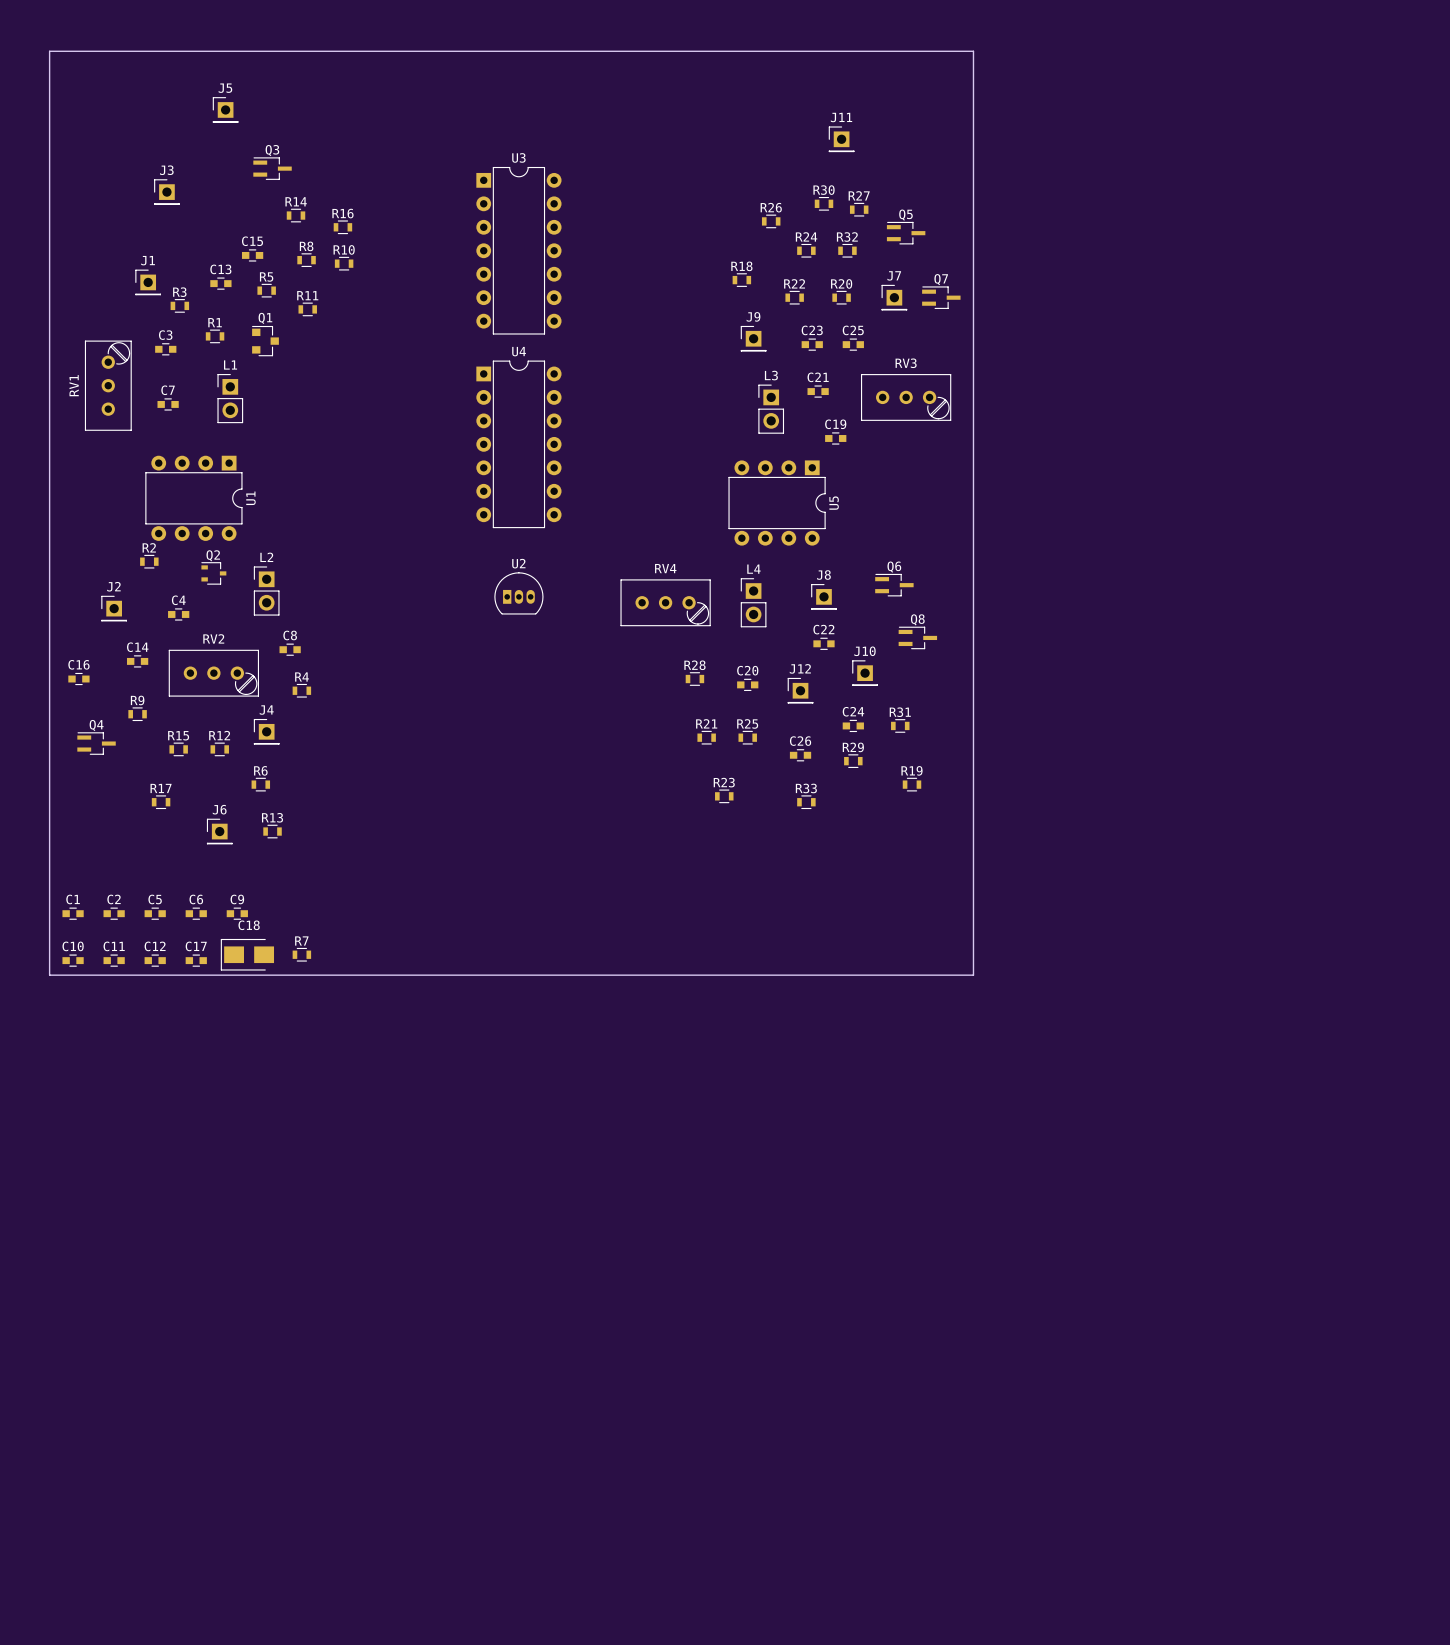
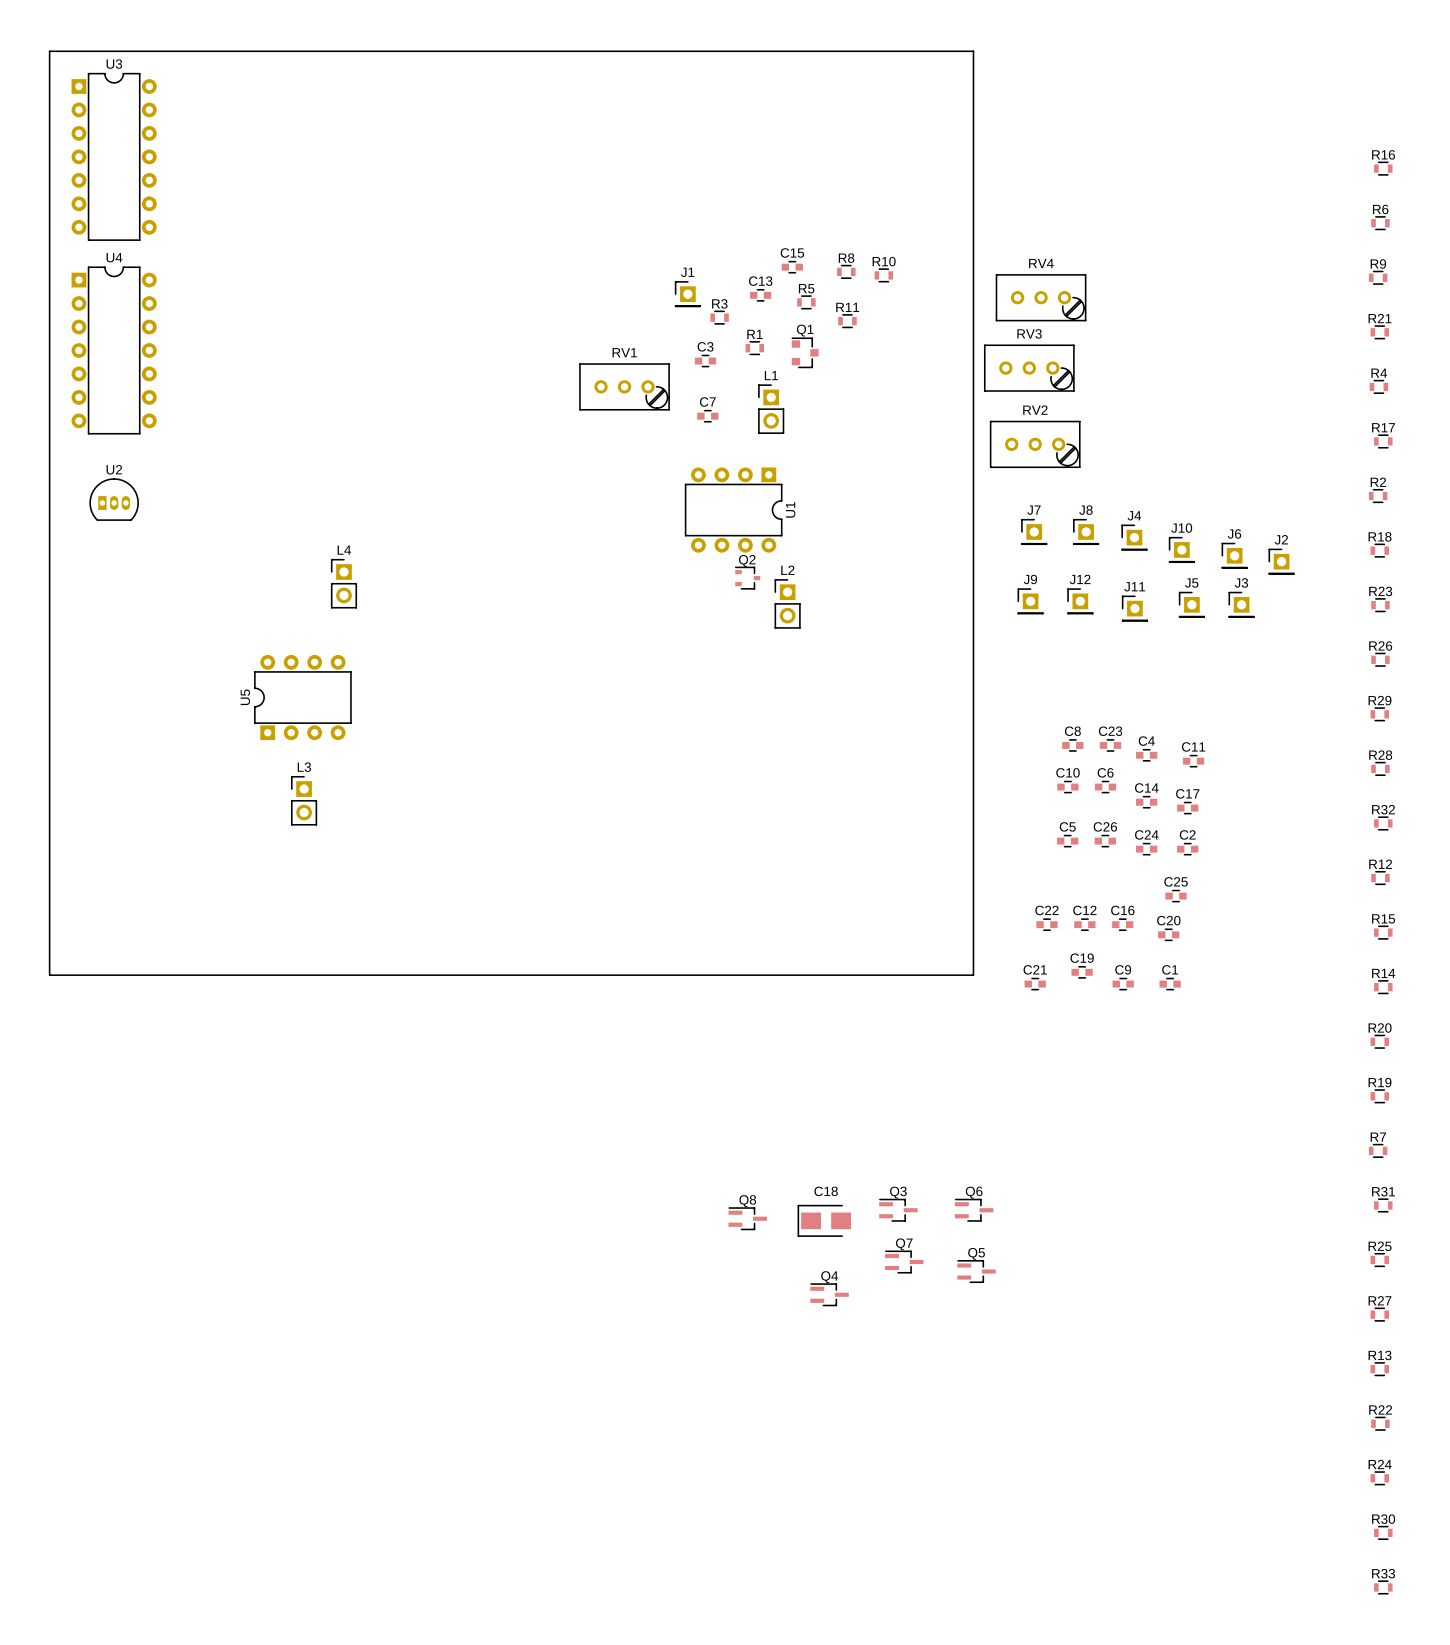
J5 position: (225, 109) -> (1191, 604)
J11 position: (841, 139) -> (1134, 608)
Q3 position: (272, 168) -> (898, 1210)
J3 position: (166, 192) -> (1241, 604)
R30 position: (823, 203) -> (1383, 1532)
R27 position: (859, 209) -> (1379, 1314)
R14 position: (296, 215) -> (1383, 987)
R26 position: (771, 221) -> (1380, 659)
R16 position: (342, 227) -> (1383, 168)
Q5 position: (906, 233) -> (976, 1271)
U3 position: (518, 250) -> (114, 156)
R24 position: (806, 250) -> (1379, 1478)
R32 position: (847, 250) -> (1383, 823)
C15 position: (252, 255) -> (792, 267)
R8 position: (306, 260) -> (846, 271)
R10 position: (344, 263) -> (883, 275)
R18 position: (741, 280) -> (1379, 550)
J1 position: (148, 282) -> (687, 294)
C13 position: (220, 283) -> (760, 295)
R5 position: (266, 290) -> (806, 302)
R22 position: (794, 297) -> (1380, 1423)
R20 position: (841, 297) -> (1379, 1041)
J7 position: (894, 297) -> (1034, 531)
Q7 position: (941, 297) -> (904, 1261)
R3 position: (179, 305) -> (719, 317)
R11 position: (307, 309) -> (847, 321)
R1 position: (215, 336) -> (754, 348)
J9 position: (753, 338) -> (1030, 601)
Q1 position: (265, 341) -> (805, 352)
C23 position: (812, 344) -> (1110, 745)
C25 position: (853, 344) -> (1175, 896)
C3 position: (165, 349) -> (705, 361)
L3 name: L3 (771, 375) -> L1 (771, 375)
RV1 rotation: 0° (108, 385) -> 90° clockwise (624, 386)
RV1 position: (108, 385) -> (624, 386)
C21 position: (818, 391) -> (1035, 984)
RV3 position: (906, 397) -> (1029, 368)
L1: (230, 398) -> none
C7 position: (168, 404) -> (707, 416)
C19 position: (835, 438) -> (1082, 972)
U4 position: (518, 444) -> (114, 350)
U1 position: (193, 498) -> (733, 510)
U5 rotation: 0° (777, 503) -> 180° (302, 697)
U5 position: (777, 503) -> (302, 697)
R2 position: (149, 561) -> (1378, 496)
Q2 position: (213, 573) -> (747, 578)
Q6 position: (894, 585) -> (974, 1210)
L2 position: (266, 591) -> (787, 603)
U2 position: (518, 593) -> (114, 499)
J8 position: (823, 596) -> (1086, 531)
RV4 position: (665, 602) -> (1041, 297)
L4 position: (753, 602) -> (343, 583)
J2 position: (114, 608) -> (1281, 561)
C4 position: (178, 614) -> (1146, 755)
Q8 position: (917, 637) -> (747, 1218)
C22 position: (823, 643) -> (1046, 924)
C8 position: (290, 649) -> (1072, 745)
C14 position: (137, 661) -> (1146, 802)
RV2 position: (213, 673) -> (1035, 444)
J10 position: (865, 673) -> (1181, 549)
C16 position: (78, 679) -> (1122, 924)
R28 position: (694, 679) -> (1380, 768)
C20 position: (747, 684) -> (1168, 934)
R4 position: (301, 690) -> (1378, 386)
J12 position: (800, 690) -> (1080, 601)
R9 position: (137, 714) -> (1378, 277)
C24 position: (853, 725) -> (1146, 849)
R31 position: (900, 725) -> (1383, 1205)
J4 position: (266, 731) -> (1134, 537)
R21 position: (706, 737) -> (1379, 332)
R25 position: (747, 737) -> (1379, 1260)
Q4 position: (96, 743) -> (829, 1294)
R15 position: (178, 749) -> (1383, 932)
R12 position: (219, 749) -> (1380, 878)
C26 position: (800, 755) -> (1105, 841)
R29 position: (853, 761) -> (1379, 714)
R6 position: (260, 784) -> (1380, 223)
R19 position: (911, 784) -> (1379, 1096)
R23 position: (724, 796) -> (1380, 605)
L3: none -> (304, 800)
R17 position: (161, 802) -> (1383, 441)
R33 position: (806, 802) -> (1383, 1587)
J6 position: (219, 831) -> (1234, 555)
R13 position: (272, 831) -> (1379, 1369)
C1 position: (73, 913) -> (1170, 984)
C2 position: (114, 913) -> (1187, 849)
C5 position: (155, 913) -> (1067, 841)
C6 position: (196, 913) -> (1105, 787)
C9 position: (237, 913) -> (1123, 984)
C18 position: (247, 954) -> (824, 1220)
R7 position: (301, 954) -> (1378, 1150)
C10 position: (73, 960) -> (1067, 787)
C11 position: (114, 960) -> (1193, 761)
C12 position: (155, 960) -> (1084, 924)
C17 position: (196, 960) -> (1187, 808)

